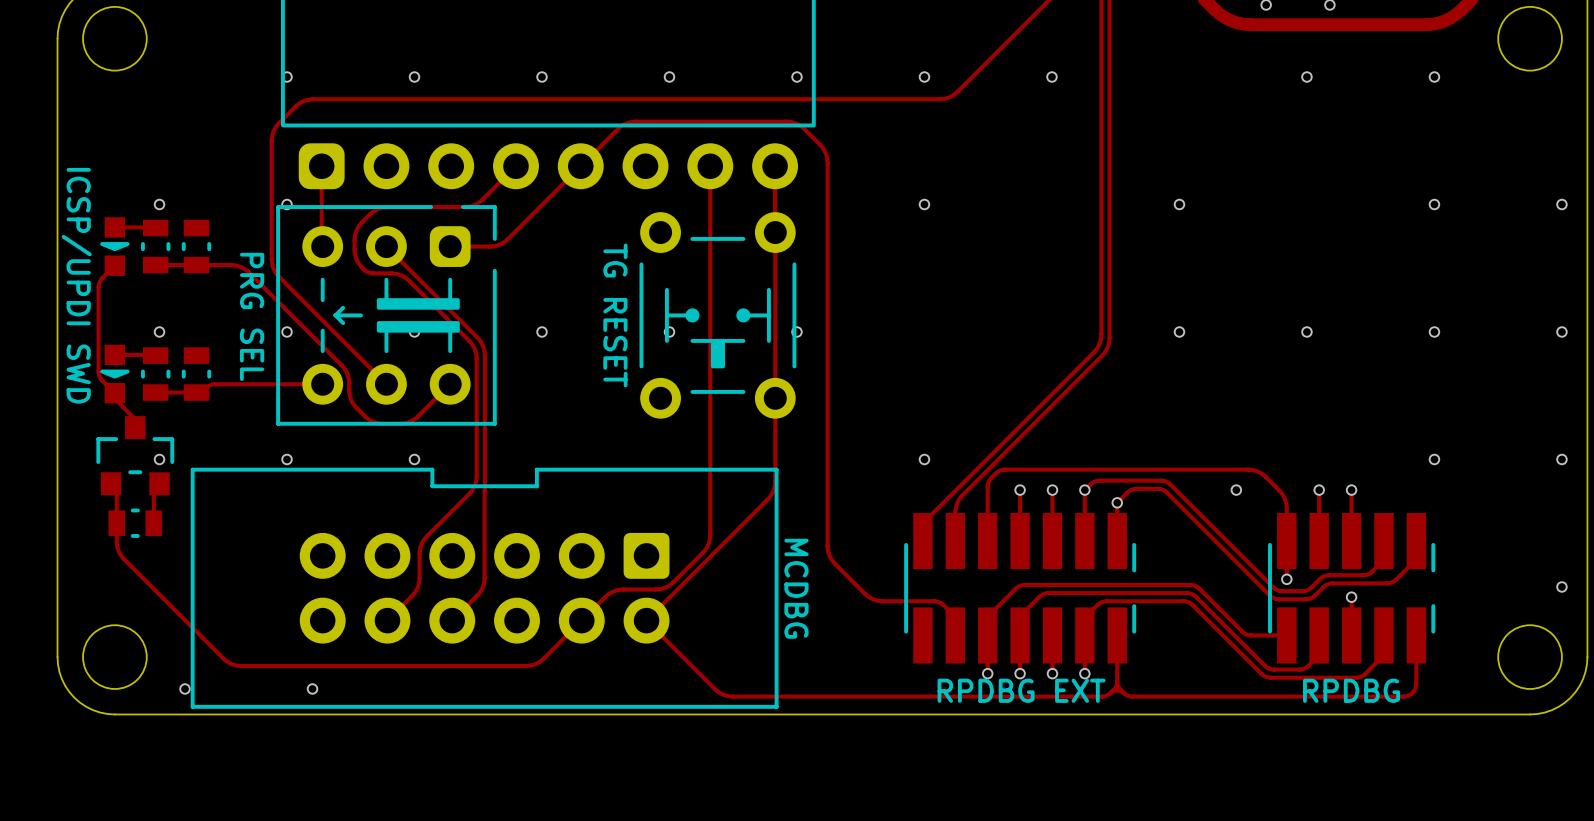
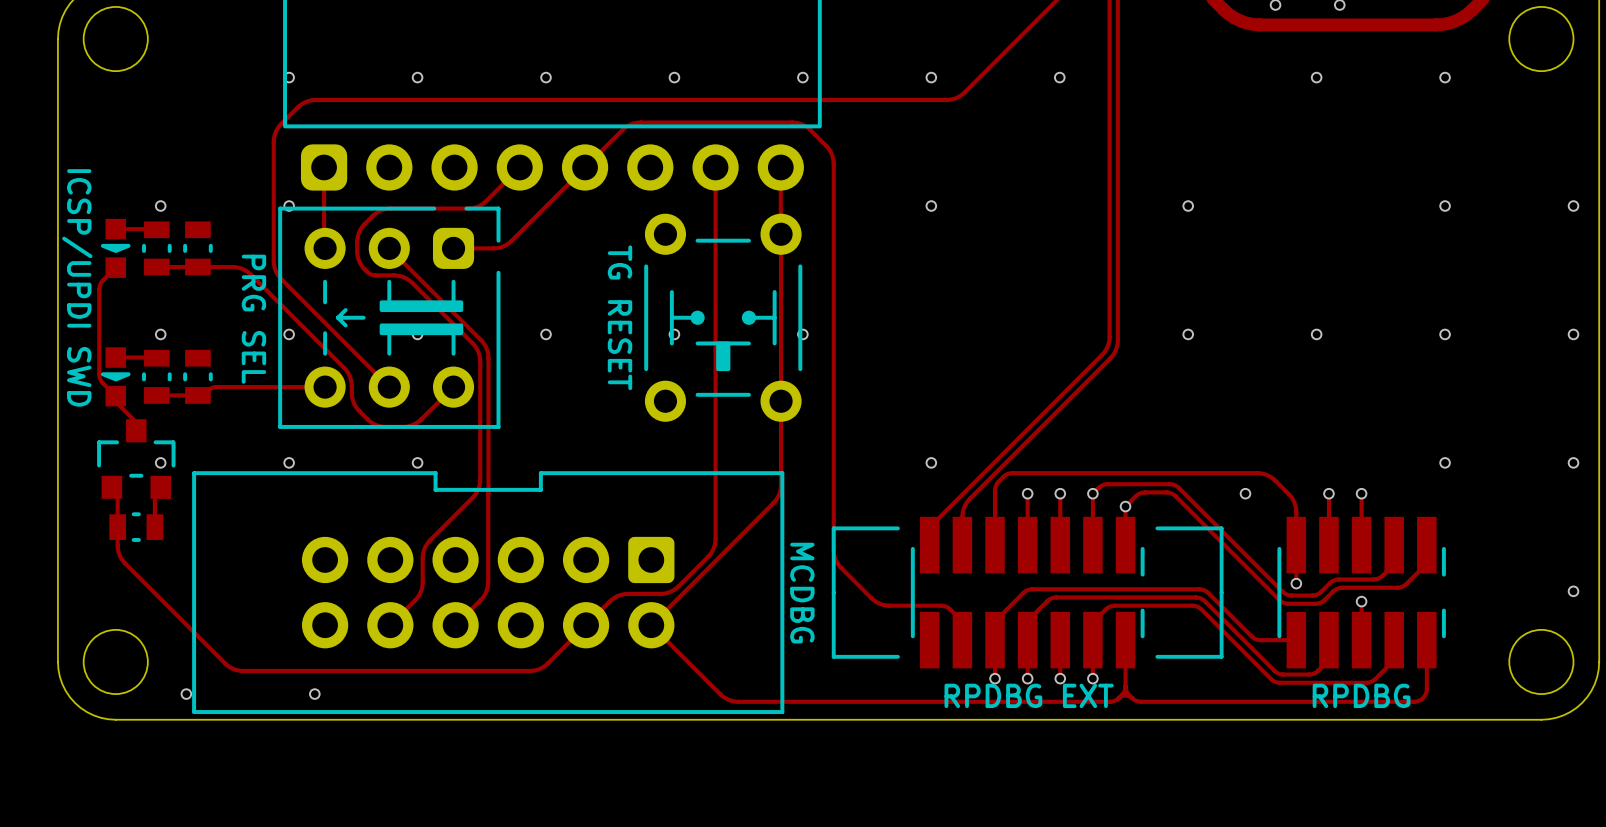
line: none -> (897, 528) (833, 528) (833, 656) (897, 656)
line: none -> (1157, 528) (1221, 528) (1221, 656) (1157, 656)

